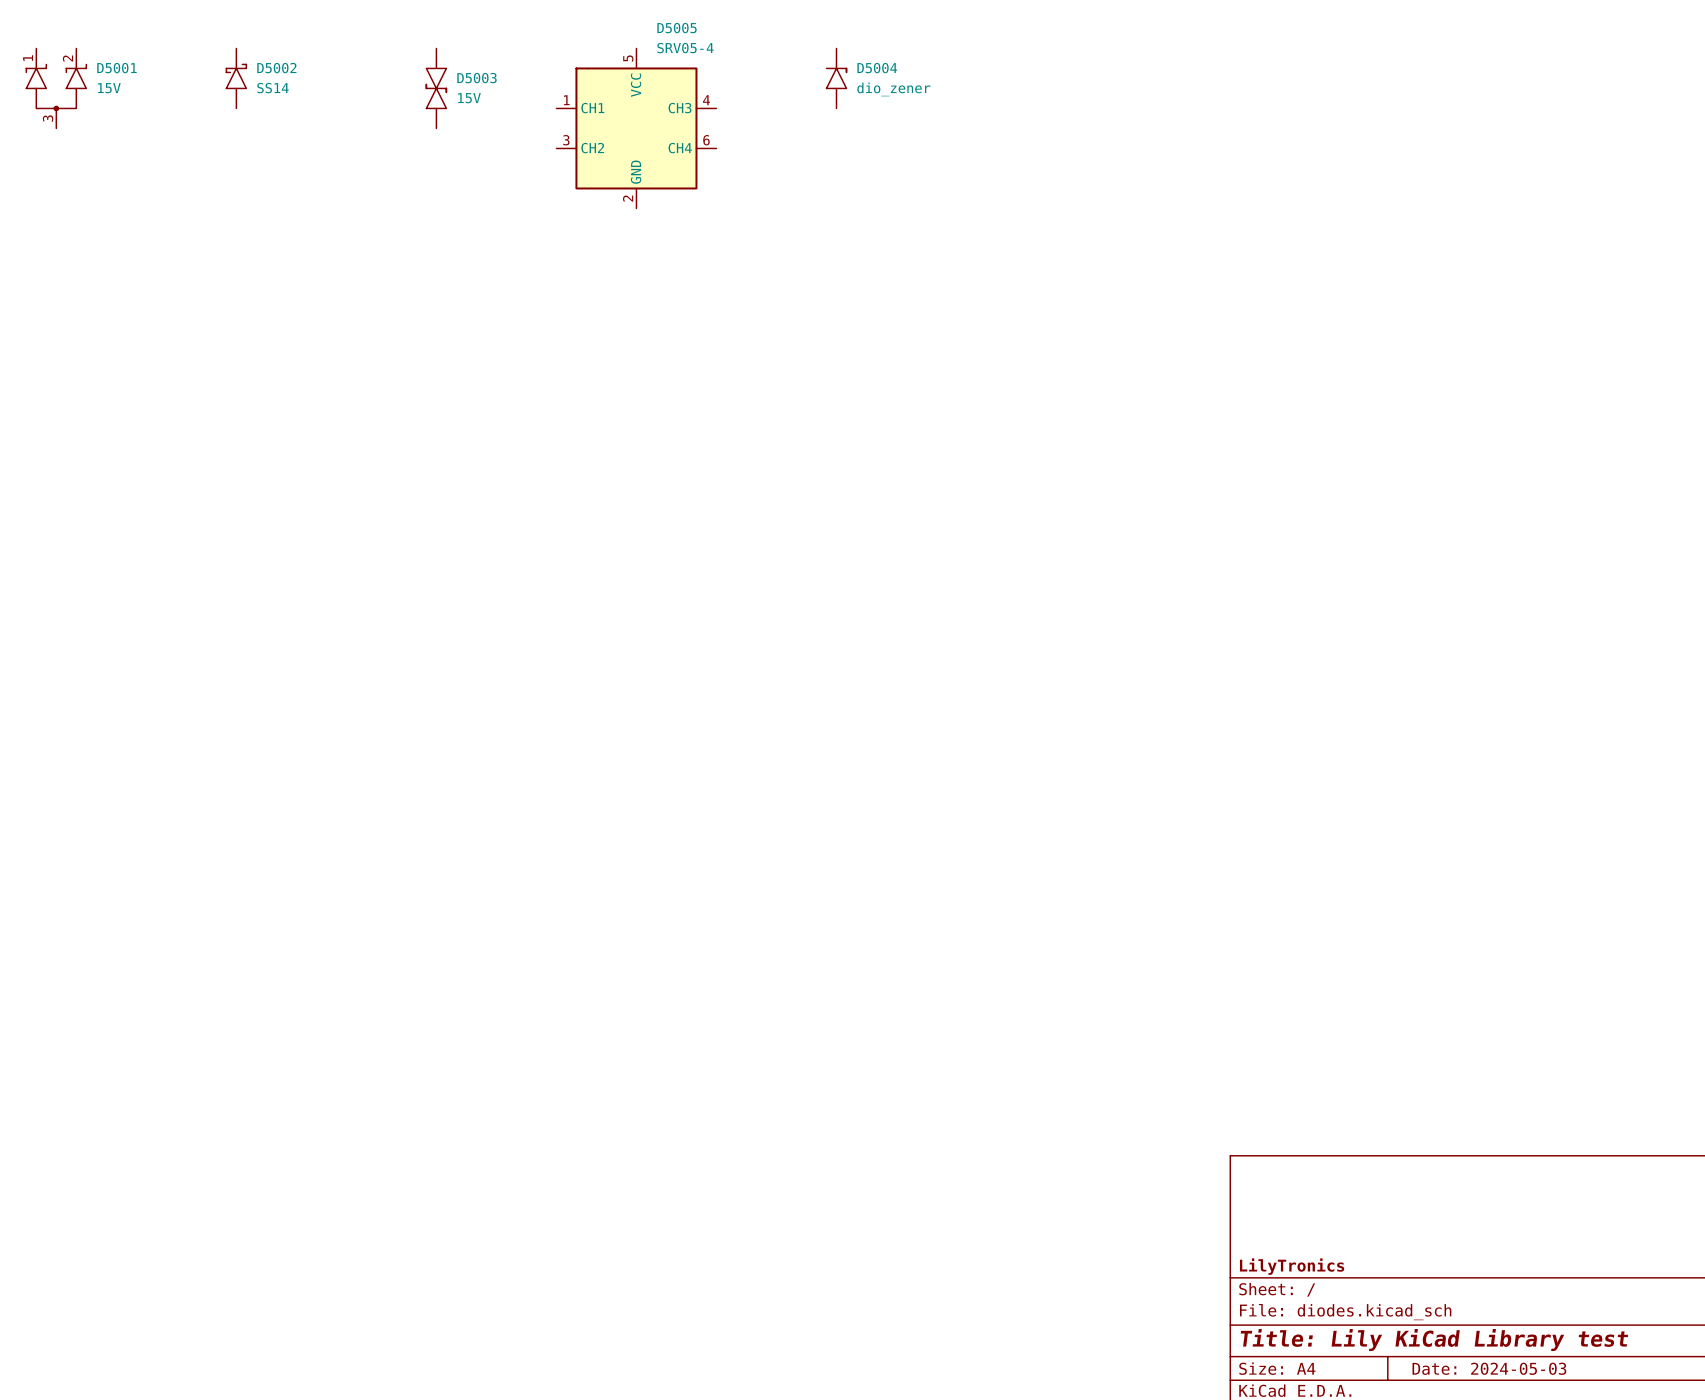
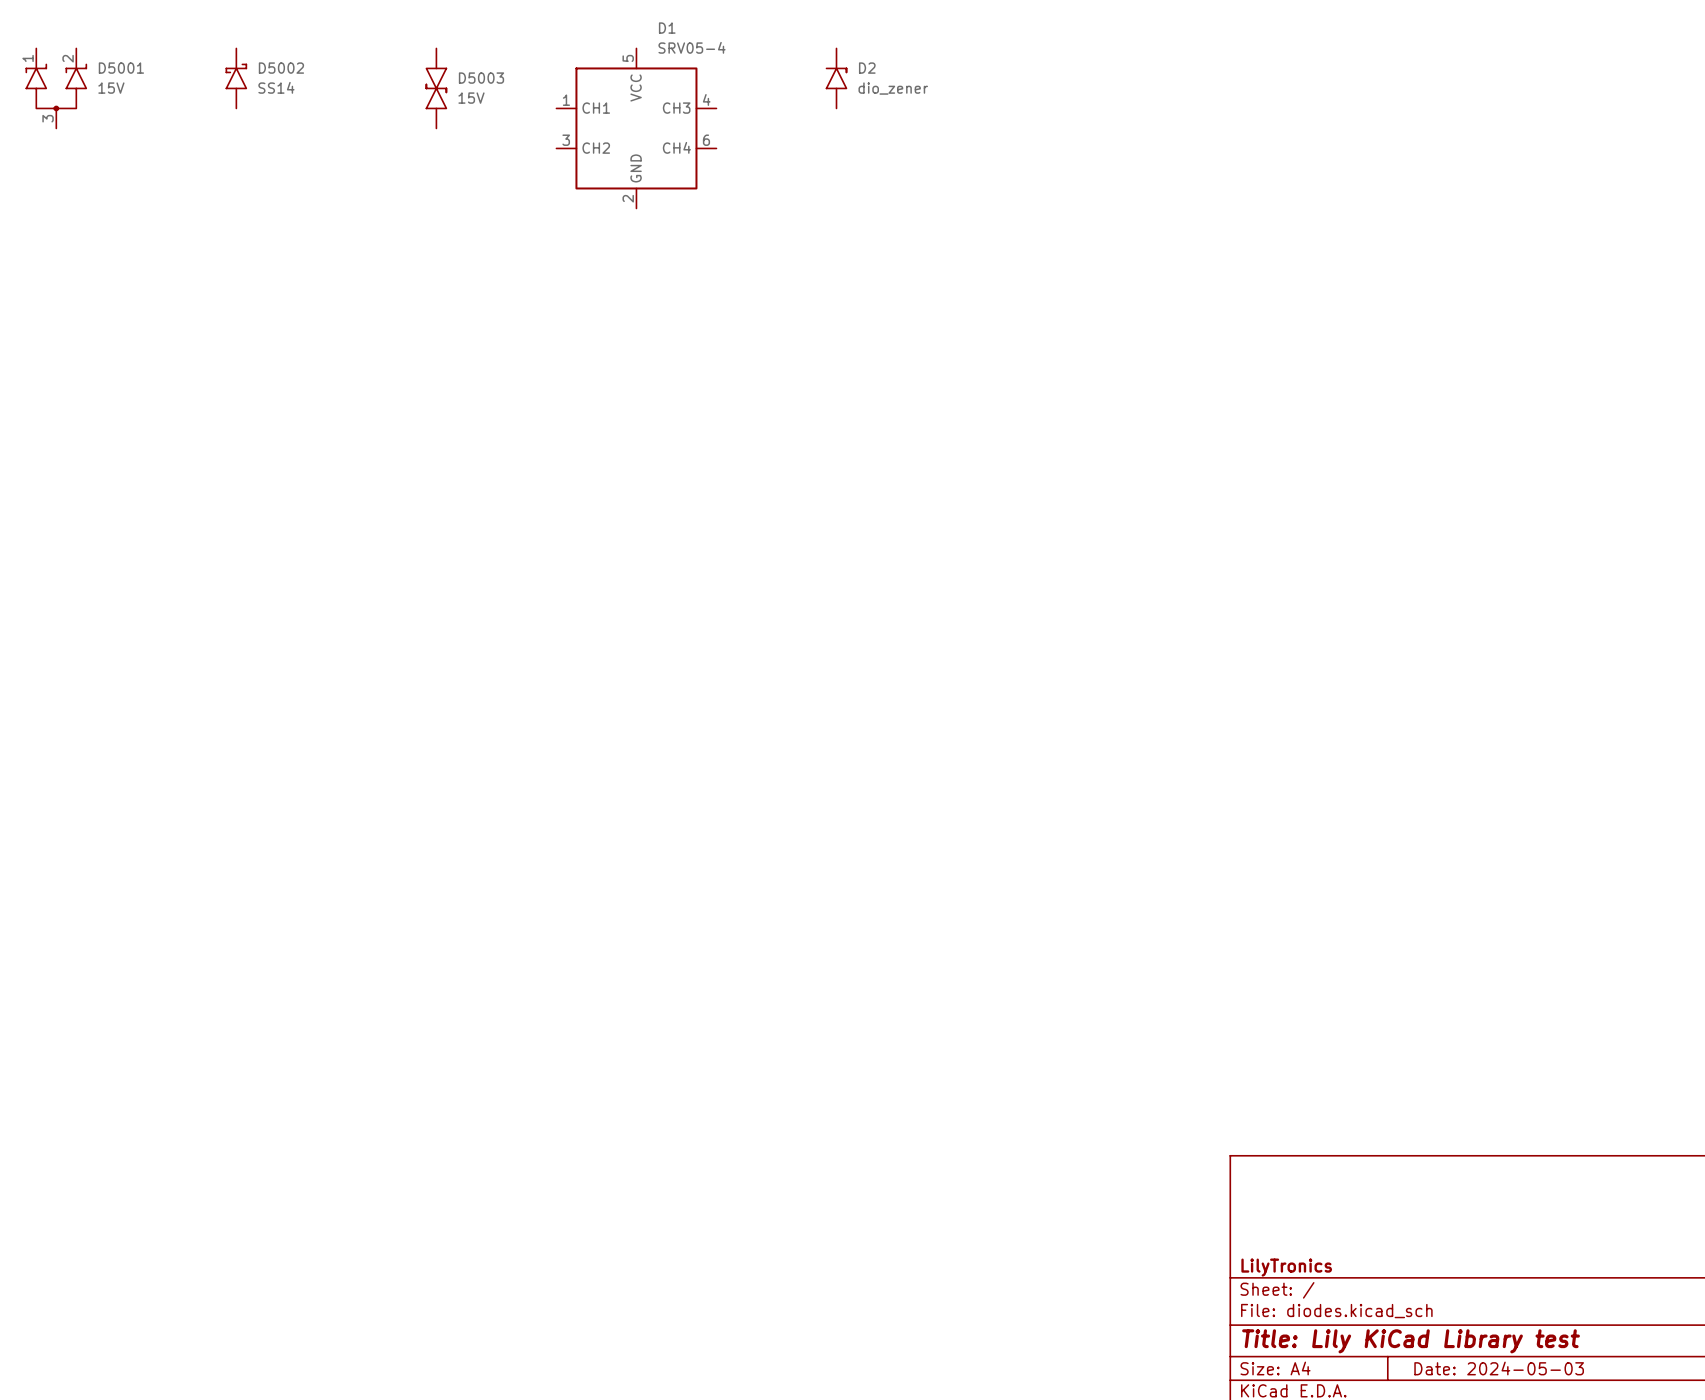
D5005 name: D5005 (677, 28) -> D1 (667, 28)
D5004 name: D5004 (877, 68) -> D2 (867, 68)

